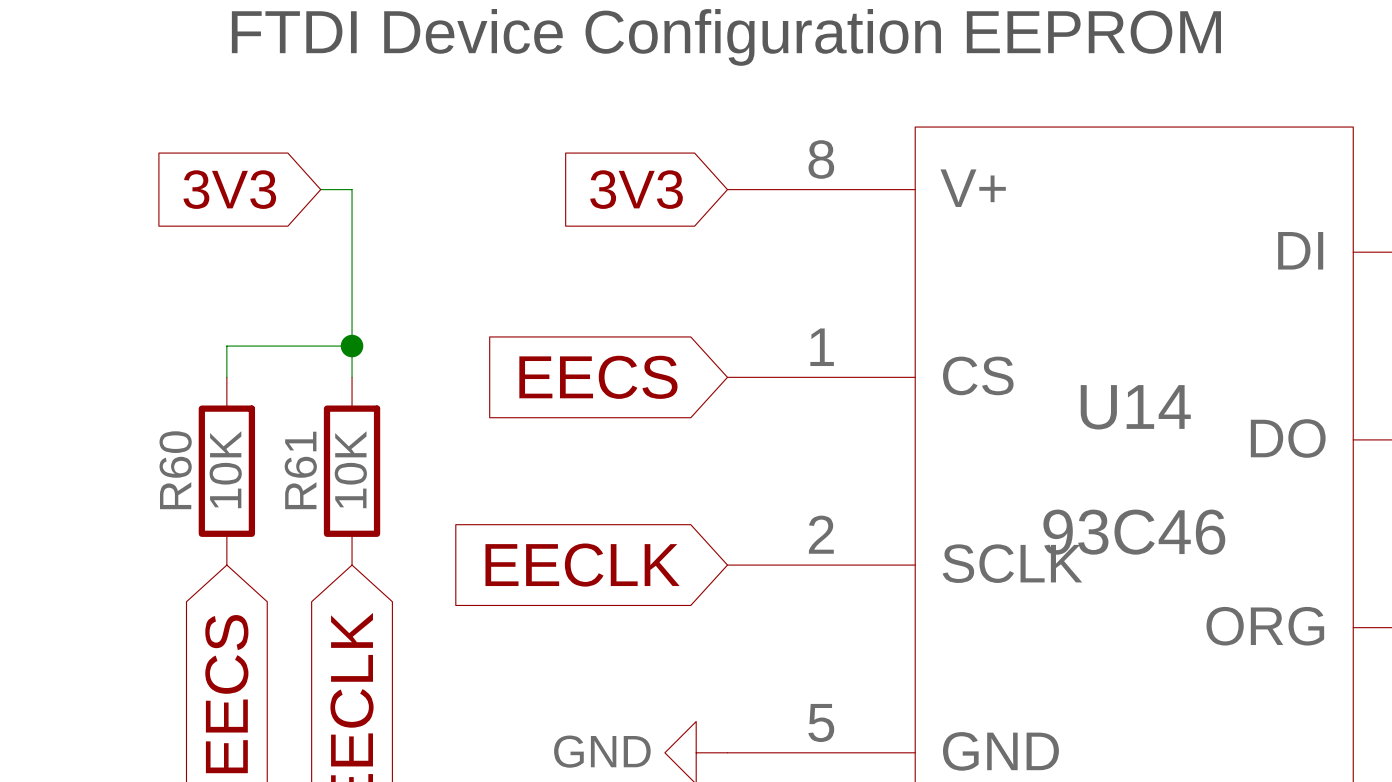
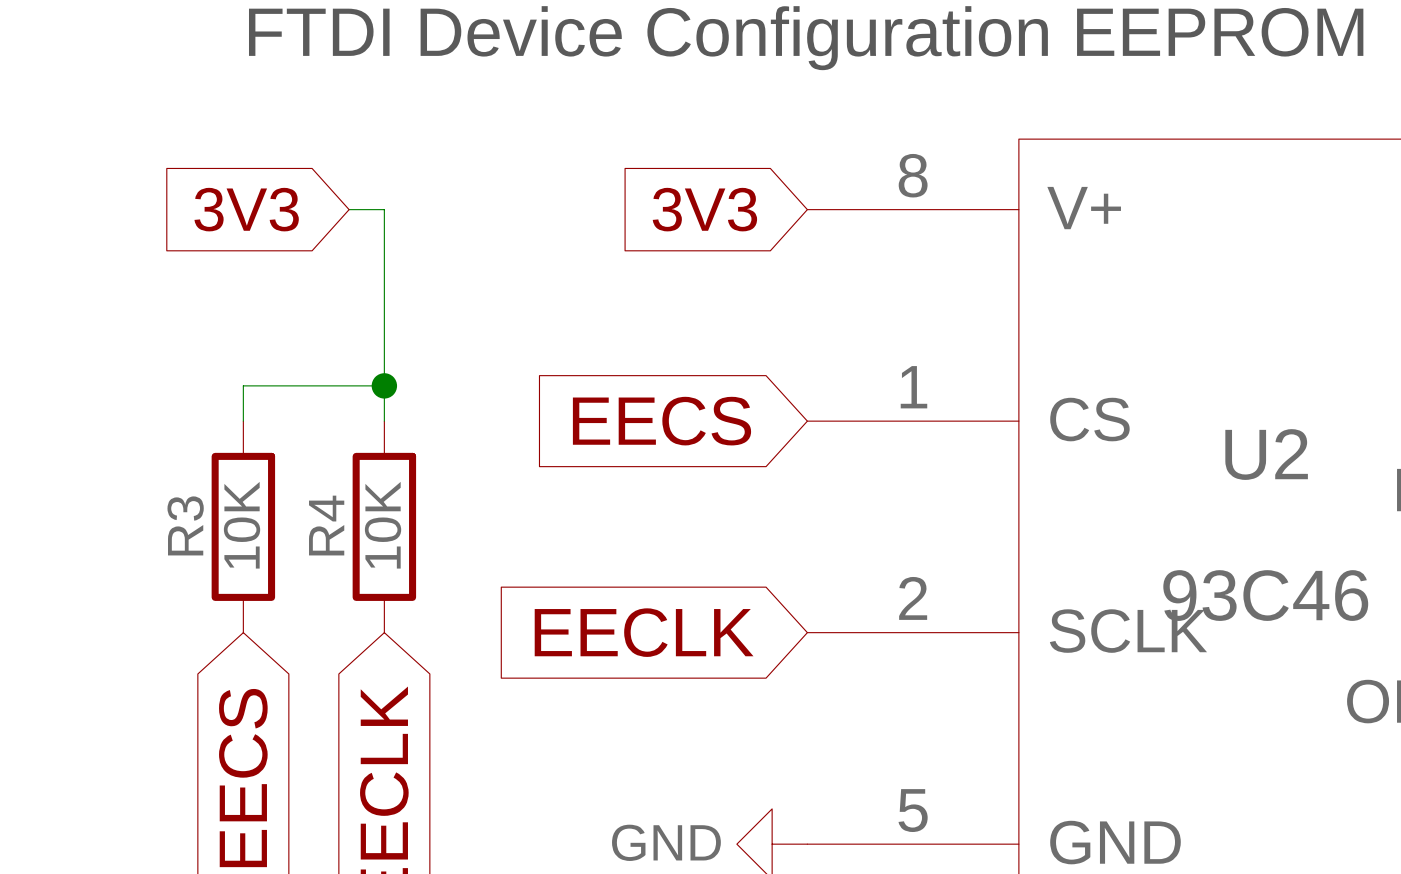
U14 name: U14 (1135, 407) -> U2 (1266, 454)
R60 name: R60 (175, 470) -> R3 (185, 525)
R61 name: R61 (300, 470) -> R4 (326, 525)

